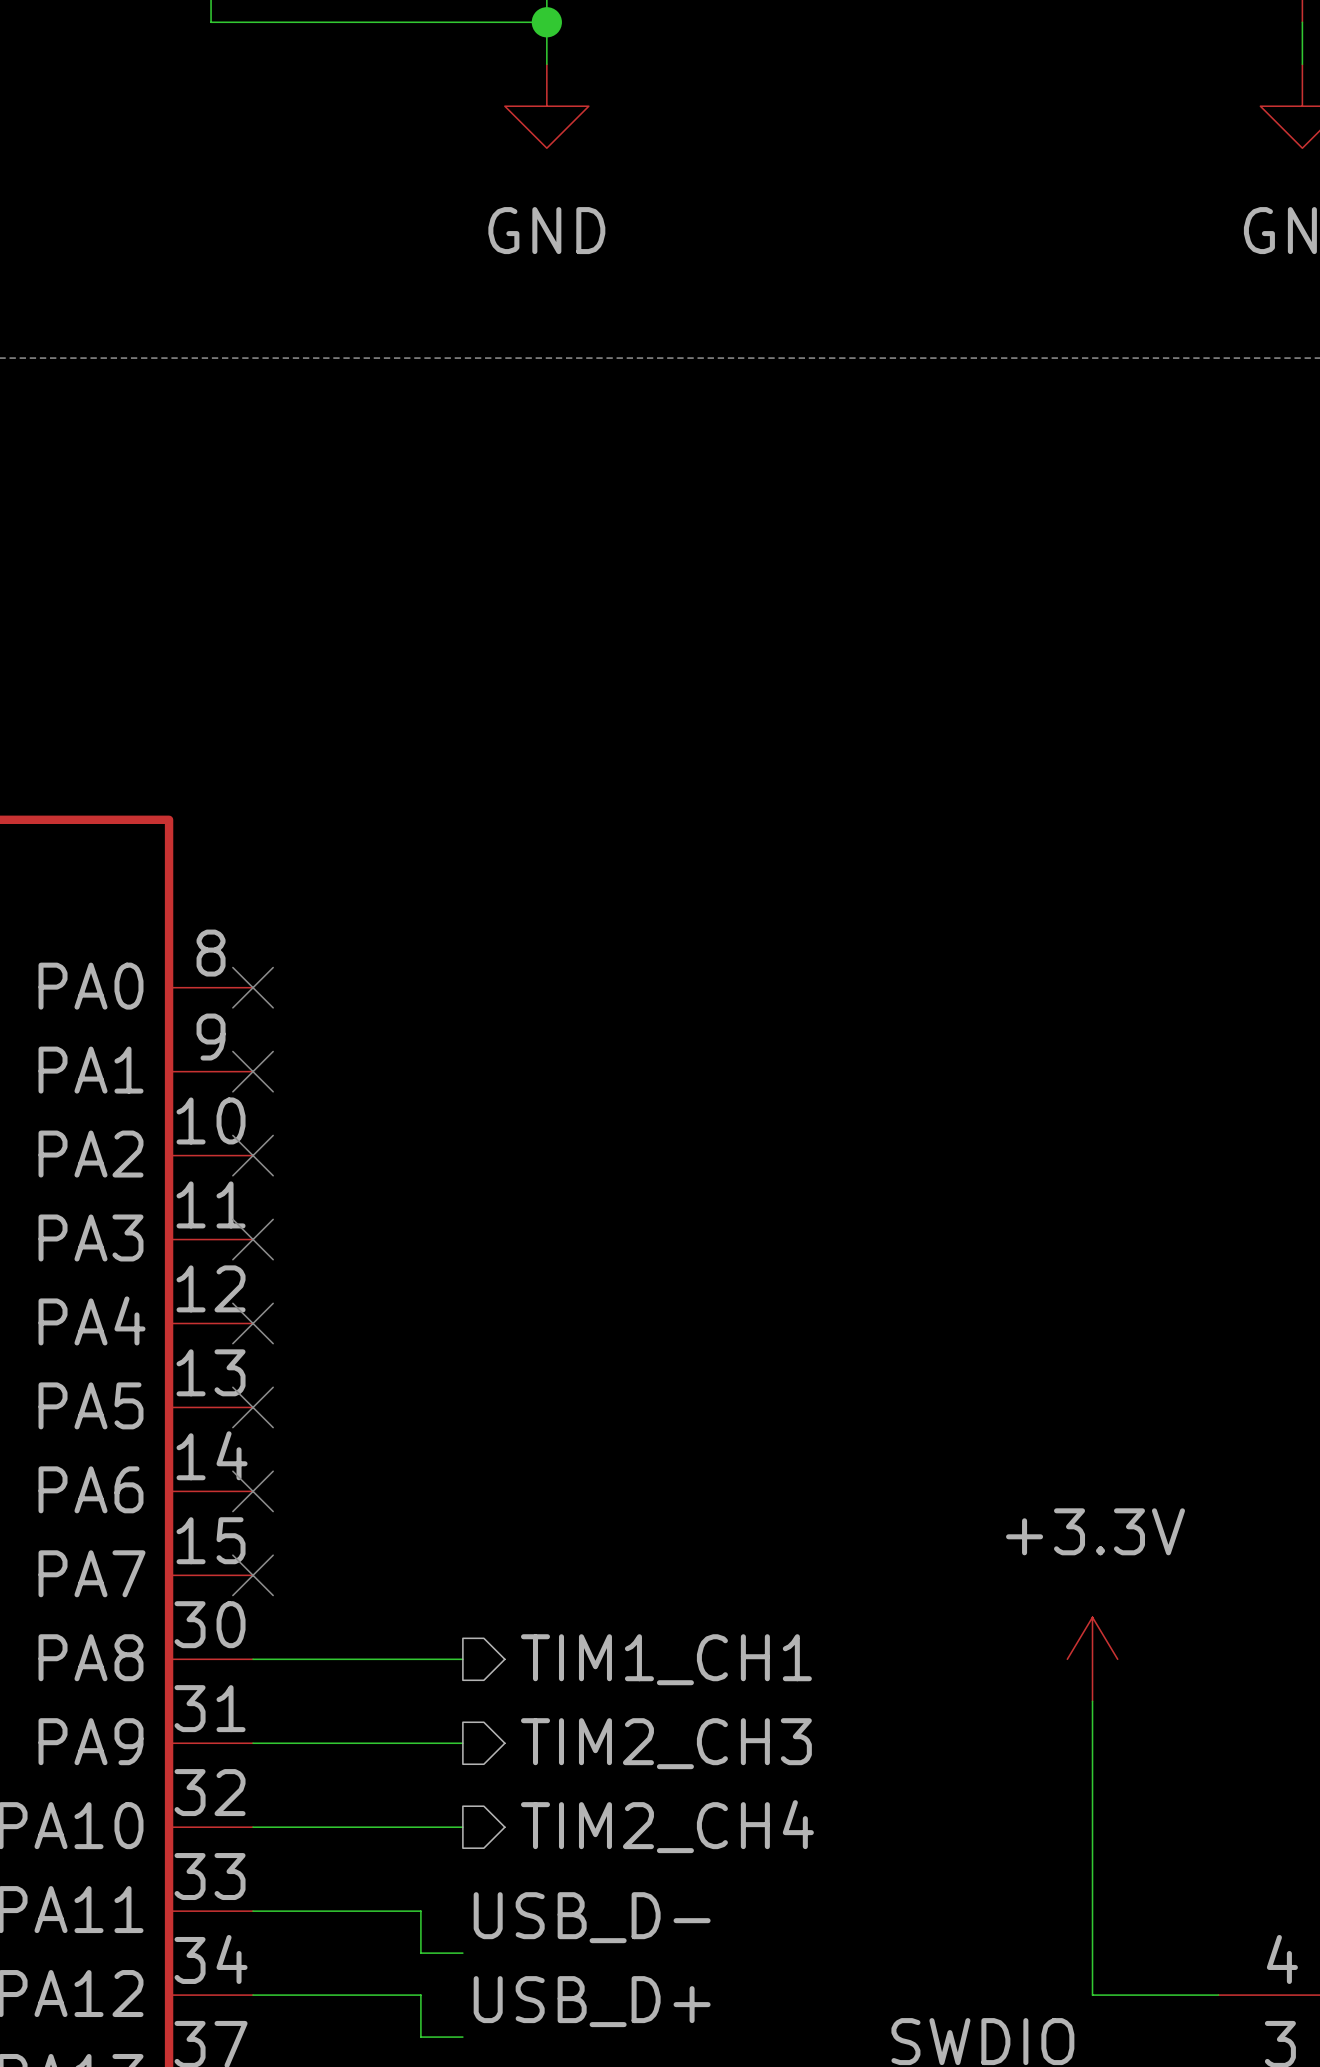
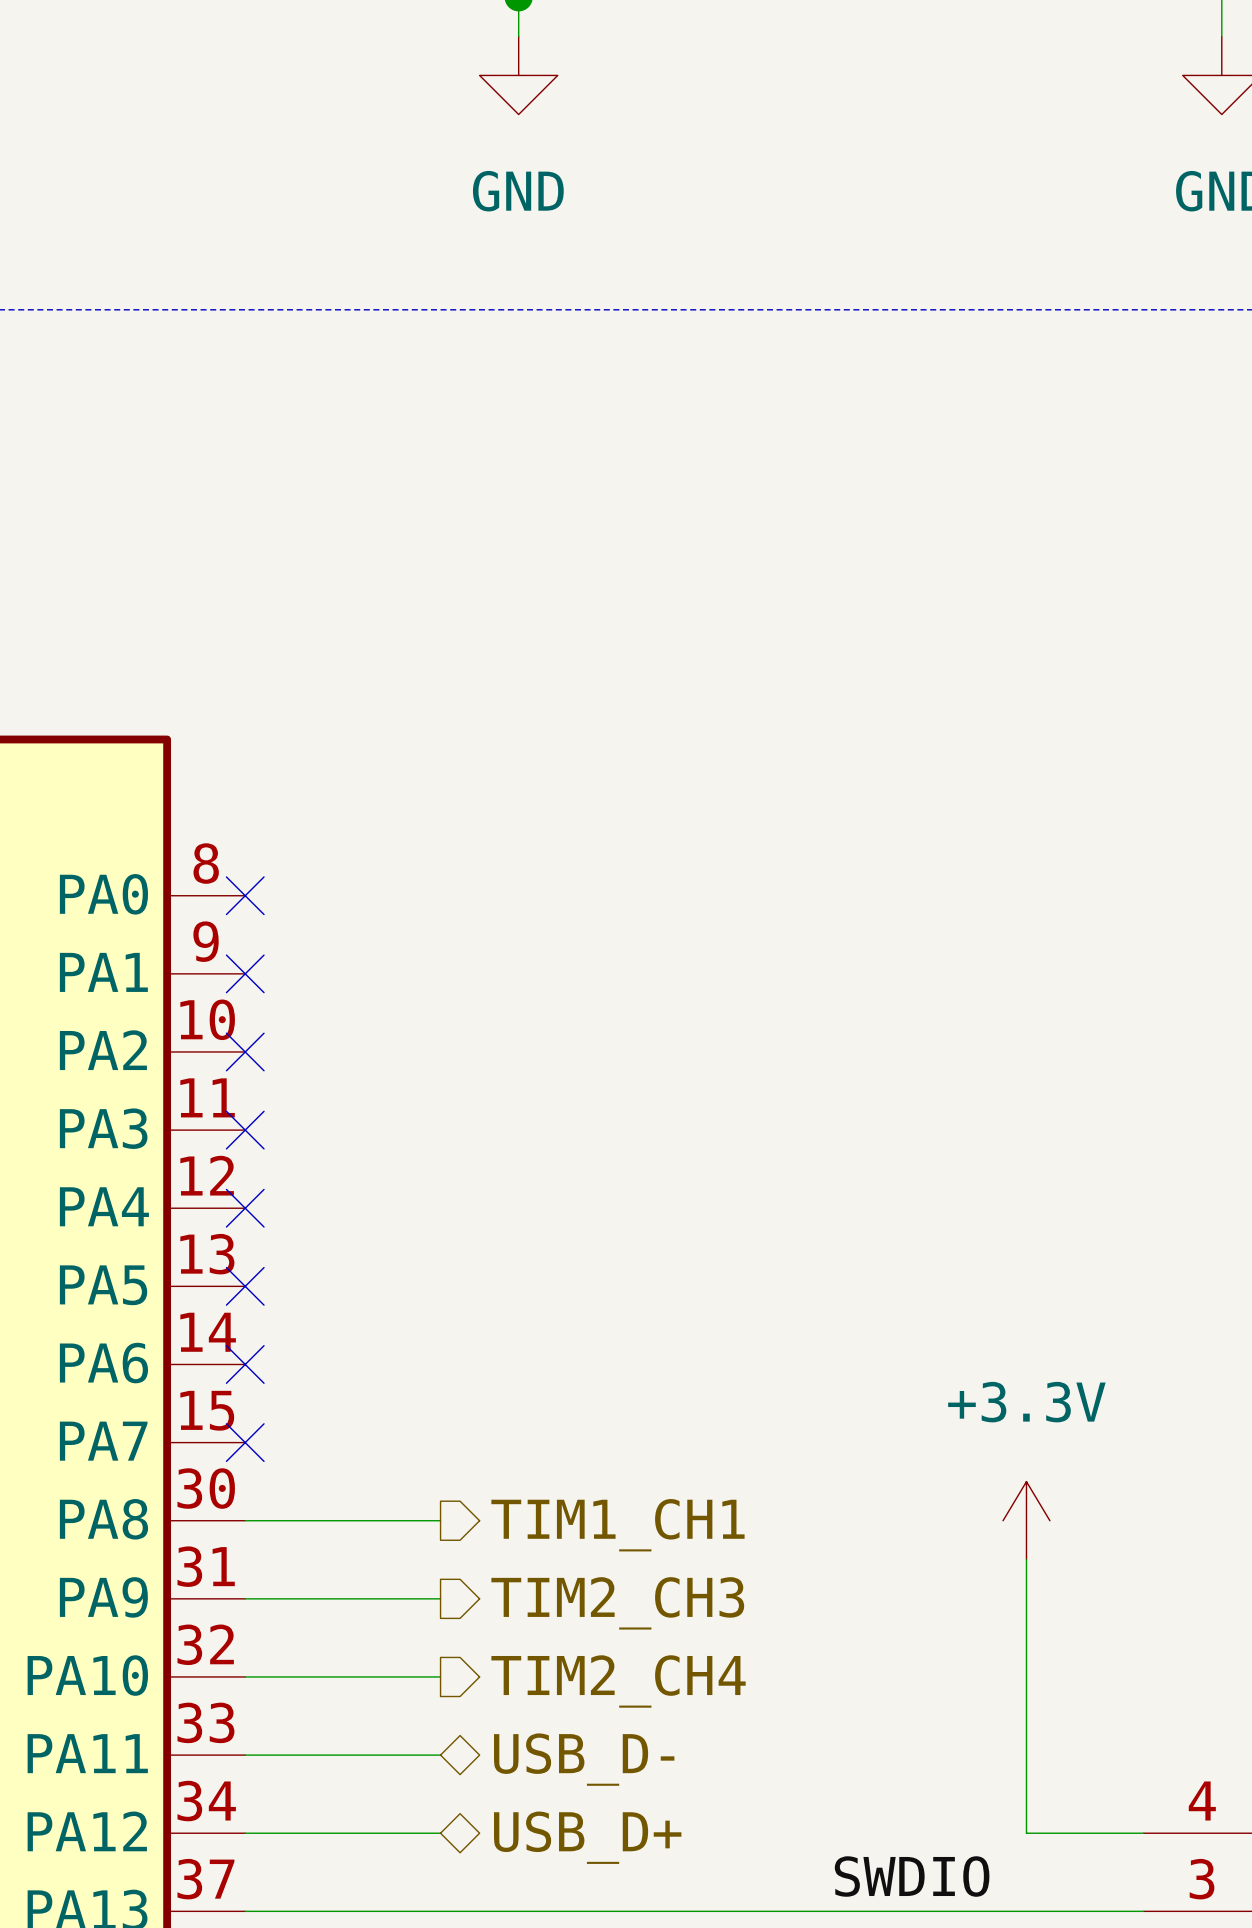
wire: (420, 1911) (420, 1953) (462, 1953) -> (401, 1755) (440, 1755)
hierarchical label: none -> USB_D- (584, 1759)
label: USB_D- (592, 1917) -> none
wire: (420, 1995) (420, 2037) (462, 2037) -> (401, 1833) (440, 1833)
hierarchical label: none -> USB_D+ (587, 1837)
label: USB_D+ (592, 2001) -> none

